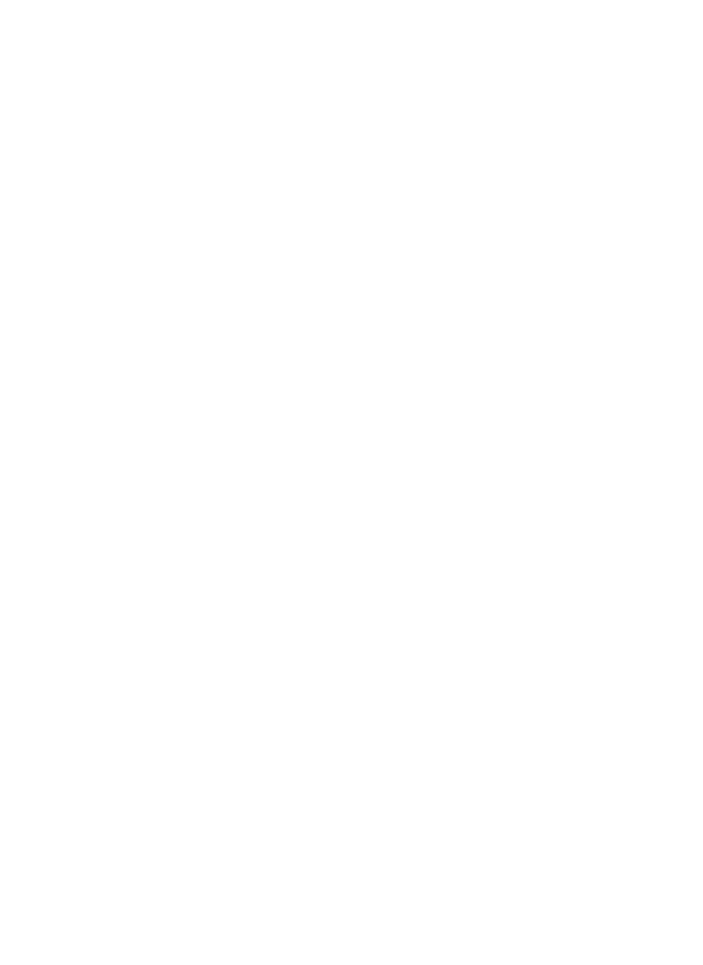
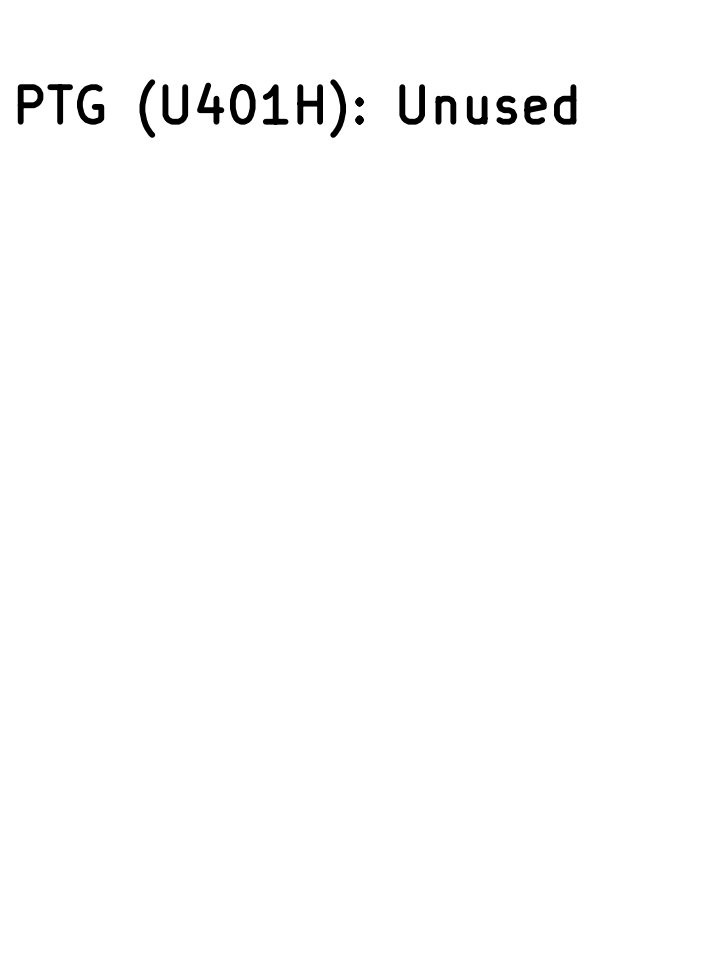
text: none -> PTG (U401H): Unused (297, 108)

